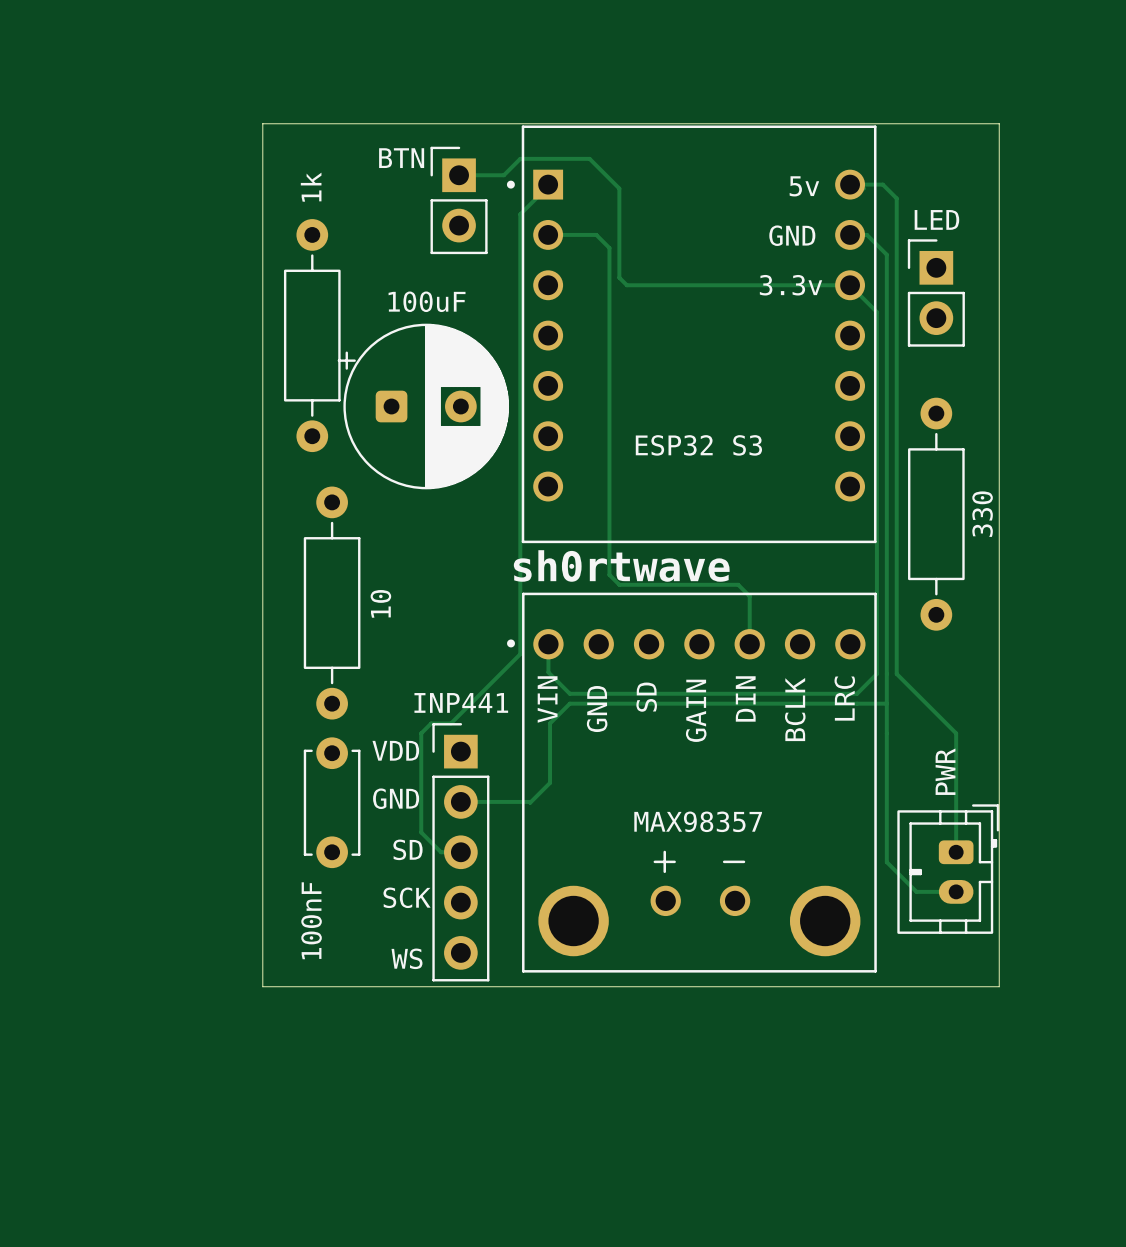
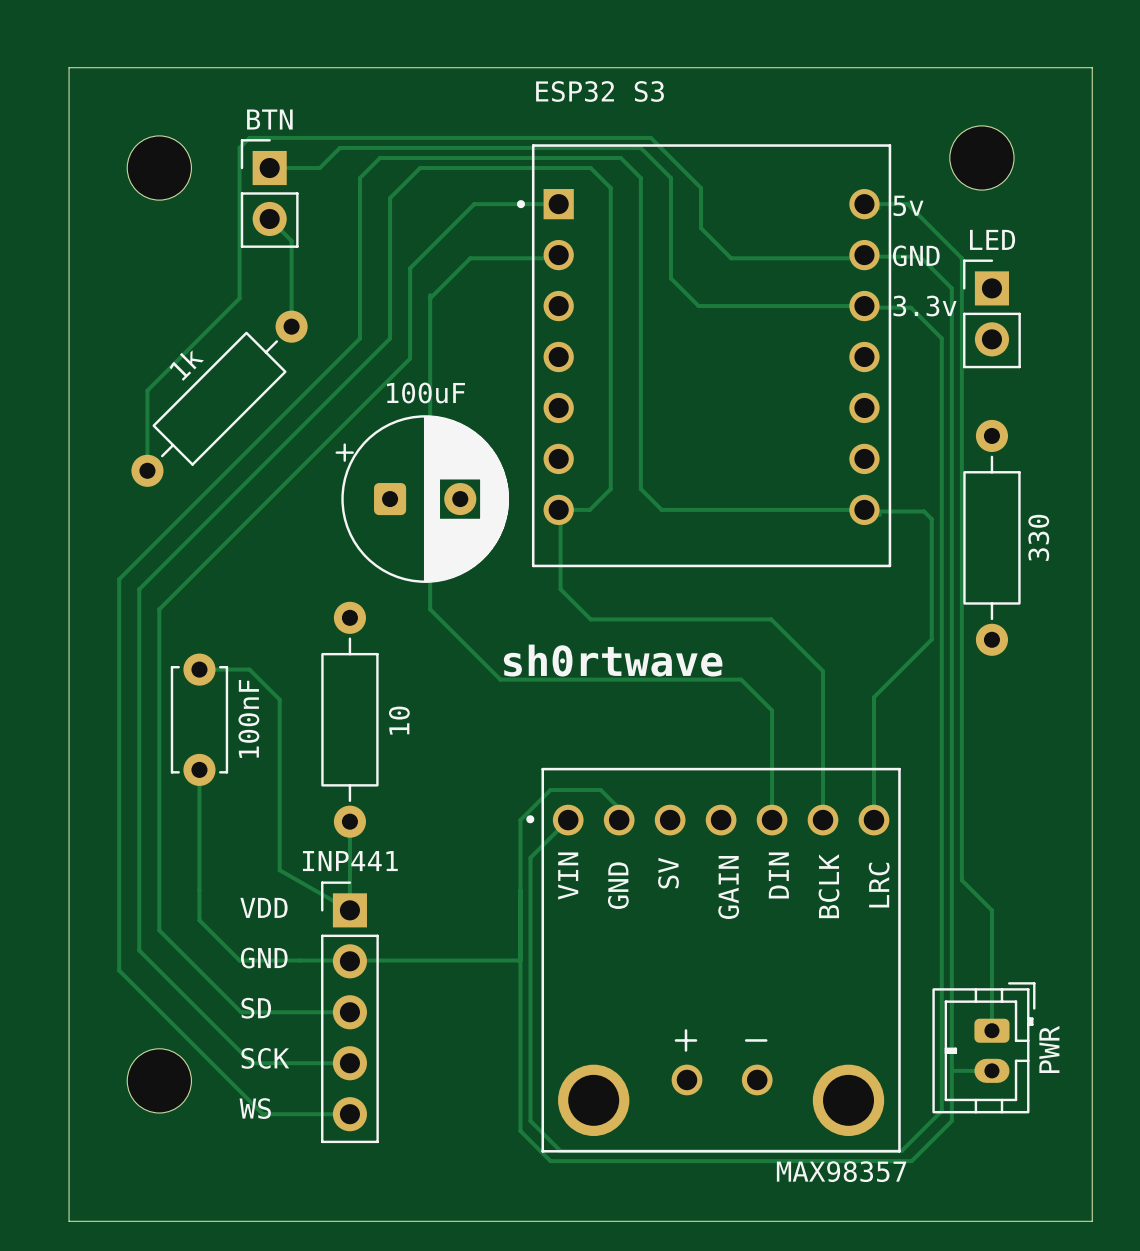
board edge: (262, 123) (999, 123) (999, 986) (262, 986) (262, 123) -> (69, 67) (69, 1221) (1092, 1221) (1092, 67) (69, 67)
part: none -> (981, 157)
part: none -> (159, 168)
track: none -> (269, 168) (319, 168) (339, 147) (640, 147) (670, 178) (670, 278) (698, 306)
BTN name position: BTN (401, 158) -> BTN (269, 119)
track: (589, 158) (520, 158) (503, 175) (459, 175) -> (600, 178) (590, 168) (420, 168) (390, 198) (390, 338) (139, 589) (139, 950) (252, 1063) (349, 1063)
track: (599, 168) (619, 188) (619, 277) (626, 285) (686, 285) -> (610, 188) (610, 489) (589, 509) (560, 509)
track: (550, 184) (520, 214) (520, 654) (450, 723) (431, 723) (421, 733) (421, 832) (441, 852) (460, 852) -> (560, 204) (474, 204) (410, 268) (410, 358) (159, 609) (159, 930) (241, 1012) (349, 1012)
track: (882, 184) (896, 198) (896, 673) (956, 733) (956, 852) (966, 842) -> (897, 204) (907, 204) (961, 258) (961, 880) (991, 910) (991, 1030) (1001, 1020)
text position: 5v (804, 186) -> 5v (908, 205)
1k name position: 1k (311, 187) -> 1k (186, 365)
track: none -> (269, 218) (291, 240) (291, 326)
BTN position: (459, 200) -> (269, 193)
track: (548, 234) (596, 234) (609, 248) (609, 574) (619, 584) (738, 584) (749, 596) (749, 644) -> none
text position: GND (792, 235) -> GND (916, 255)
track: (861, 236) (851, 234) (867, 234) (886, 254) (886, 862) (916, 891) (956, 891) -> (876, 256) (920, 256) (951, 288) (951, 1121) (911, 1161) (550, 1161) (520, 1131) (520, 820) (550, 789) (600, 789) (619, 808) (619, 820)
track: none -> (550, 258) (470, 258) (430, 298)
track: none -> (863, 258) (731, 258) (701, 228) (701, 188) (650, 137) (249, 137) (239, 147) (239, 298) (147, 390) (147, 470)
track: none -> (430, 295) (430, 609) (500, 679) (741, 679) (772, 710) (772, 820)
text position: 3.3v (791, 285) -> 3.3v (925, 306)
track: (850, 285) (876, 312) (876, 673) (857, 693) (569, 693) (548, 672) (548, 644) -> none
track: none -> (876, 307) (910, 307) (941, 338) (941, 1110) (901, 1151) (560, 1151) (530, 1121) (530, 857) (568, 820)
LED position: (936, 292) -> (991, 313)
1k rotation: 0° (312, 335) -> 45° clockwise (219, 398)
100uF position: (423, 406) -> (422, 499)
ESP32 S3 name position: ESP32 S3 (698, 445) -> ESP32 S3 (600, 91)
track: none -> (866, 509) (661, 509) (640, 489) (640, 178) (620, 157) (380, 157) (359, 178) (359, 338) (119, 579) (119, 970) (262, 1114) (349, 1114)
track: none -> (879, 515) (876, 511) (924, 511) (931, 519) (931, 639) (873, 697) (873, 820)
track: none -> (560, 519) (560, 589) (590, 619) (771, 619) (823, 671) (823, 820)
330 position: (936, 514) -> (991, 537)
text position: sh0rtwave (621, 565) -> sh0rtwave (613, 660)
10 position: (332, 603) -> (349, 719)
track: none -> (199, 669) (249, 669) (279, 699) (279, 870) (349, 910) (349, 821)
text: SD (646, 697) -> none
text position: DIN (745, 698) -> DIN (778, 875)
text position: LRC (844, 698) -> LRC (879, 885)
text position: VIN (547, 699) -> VIN (568, 876)
track: (886, 703) (569, 703) (550, 723) (550, 782) (530, 802) (460, 801) -> none
text: GND (597, 709) -> none
text position: BCLK (795, 709) -> BCLK (829, 886)
text position: GAIN (696, 710) -> GAIN (728, 887)
track: none -> (199, 769) (199, 920) (239, 960) (349, 960)
text position: VDD (395, 750) -> VDD (263, 907)
PWR name position: PWR (945, 771) -> PWR (1049, 1049)
MAX98357 position: (691, 782) -> (713, 960)
text: GND (396, 798) -> none
100nF position: (332, 802) -> (199, 719)
MAX98357 name position: MAX98357 (698, 821) -> MAX98357 (841, 1171)
text: none -> SV (668, 873)
text position: SD (407, 849) -> SD (256, 1008)
INP441 position: (460, 852) -> (349, 1012)
text: none -> GND (618, 885)
PWR position: (948, 869) -> (983, 1047)
text position: SCK (407, 897) -> SCK (265, 1058)
100nF name position: 100nF (311, 920) -> 100nF (248, 718)
text: none -> GND (264, 958)
track: none -> (520, 960) (358, 961)
text position: WS (407, 958) -> WS (255, 1108)
track: none -> (951, 1070) (991, 1070)
part: none -> (159, 1080)

